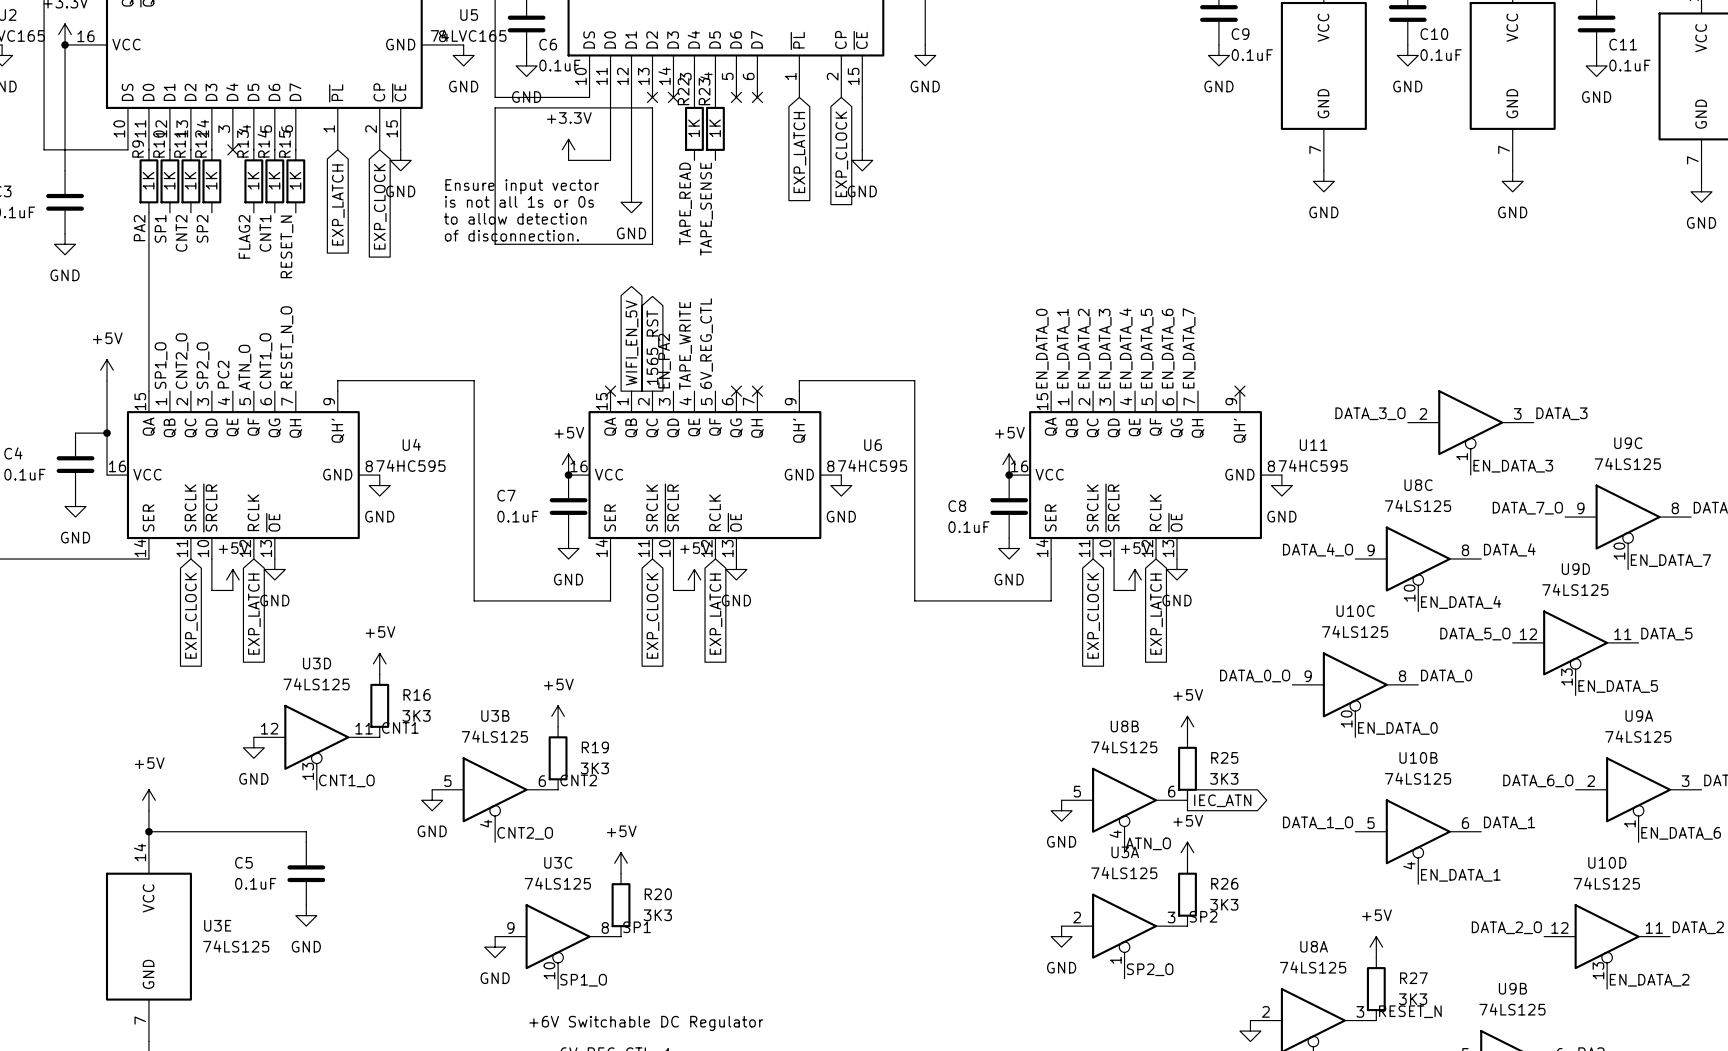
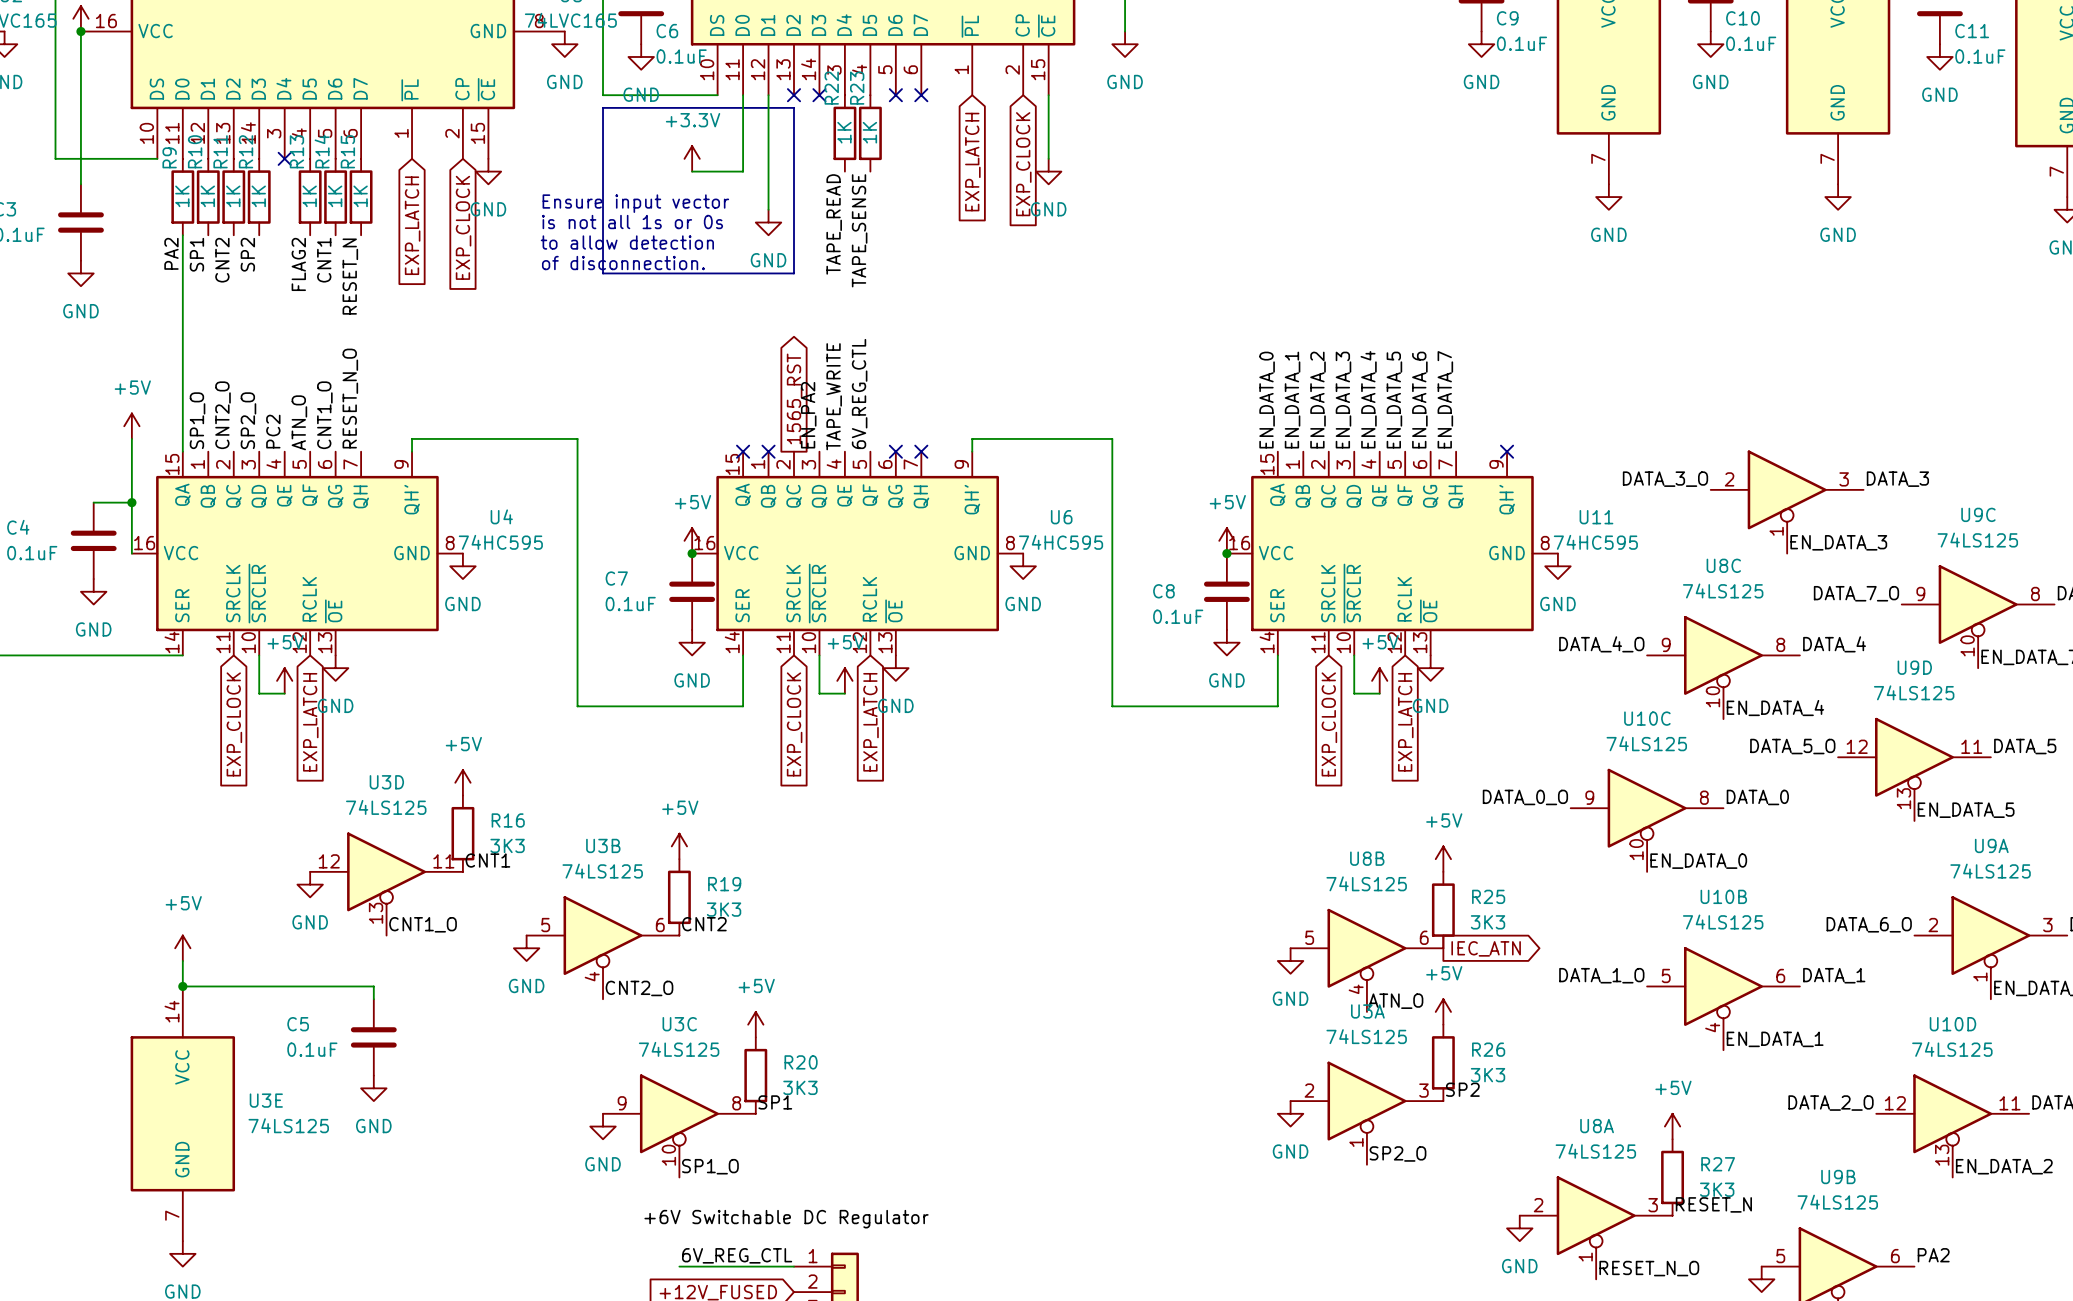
global label: WIFI_EN_5V (632, 342) -> none
no-connect mark: none -> (768, 451)

